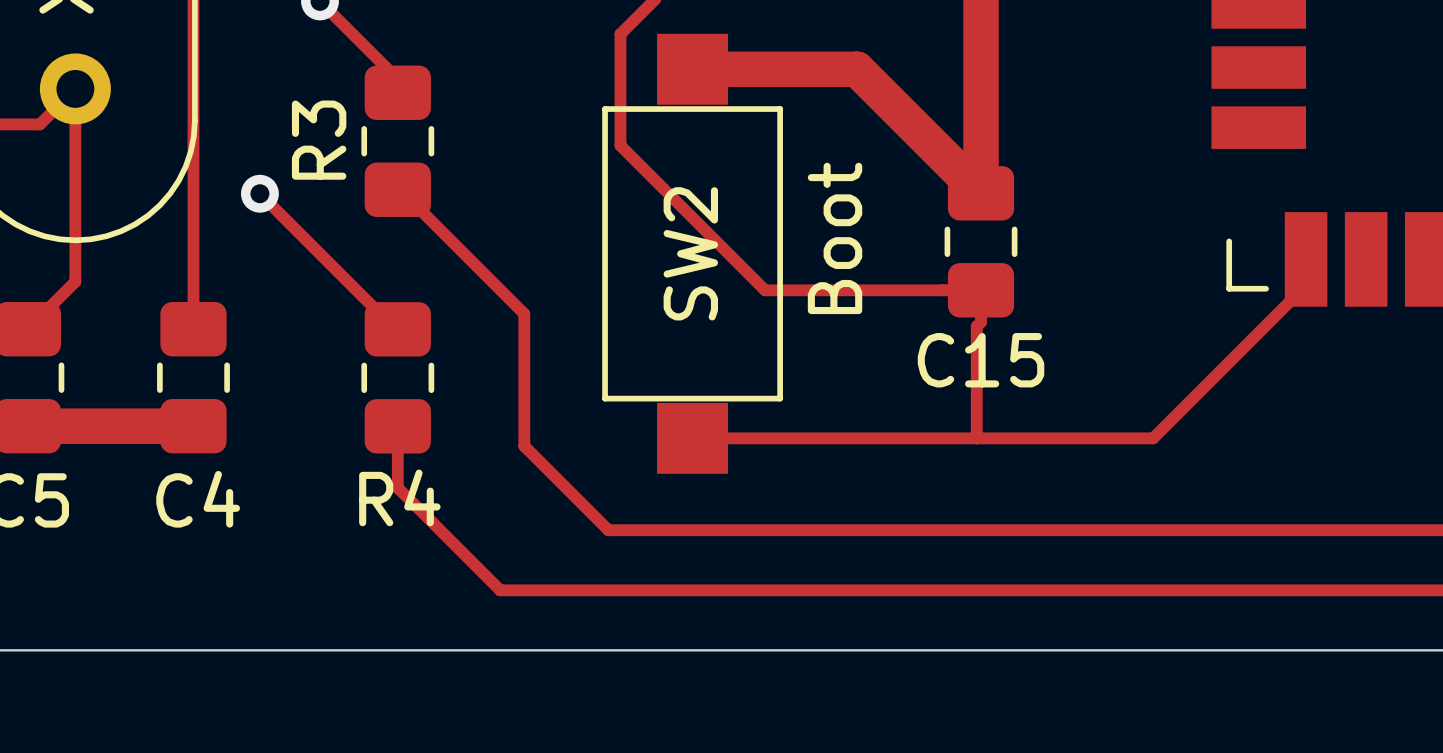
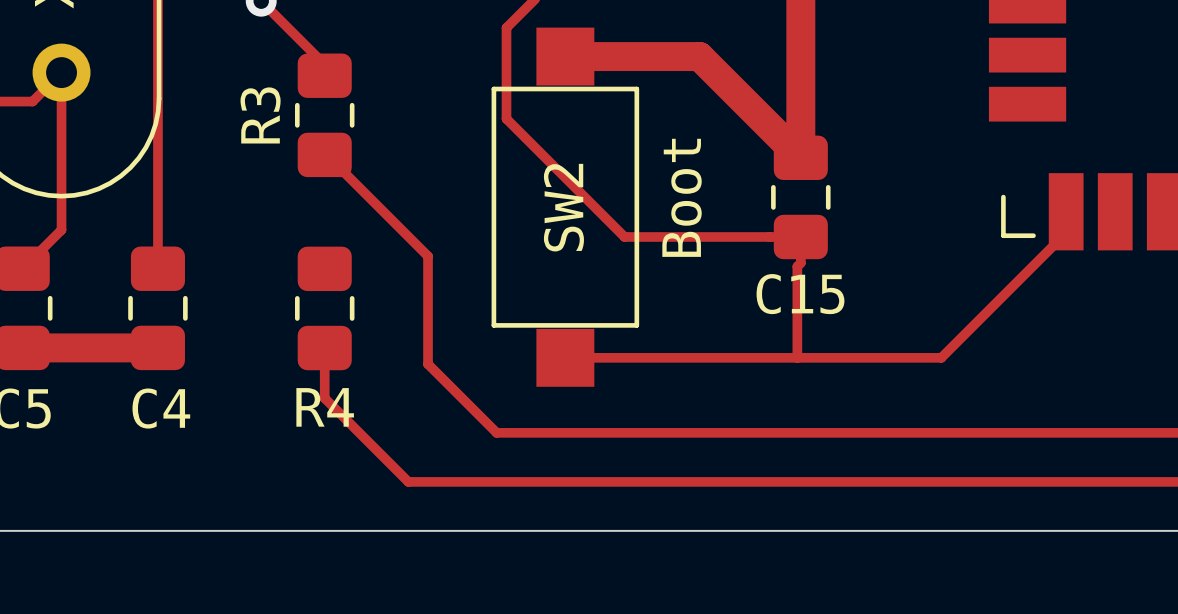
track: (259, 193) (395, 329) (397, 329) -> none
via: (259, 193) -> none

